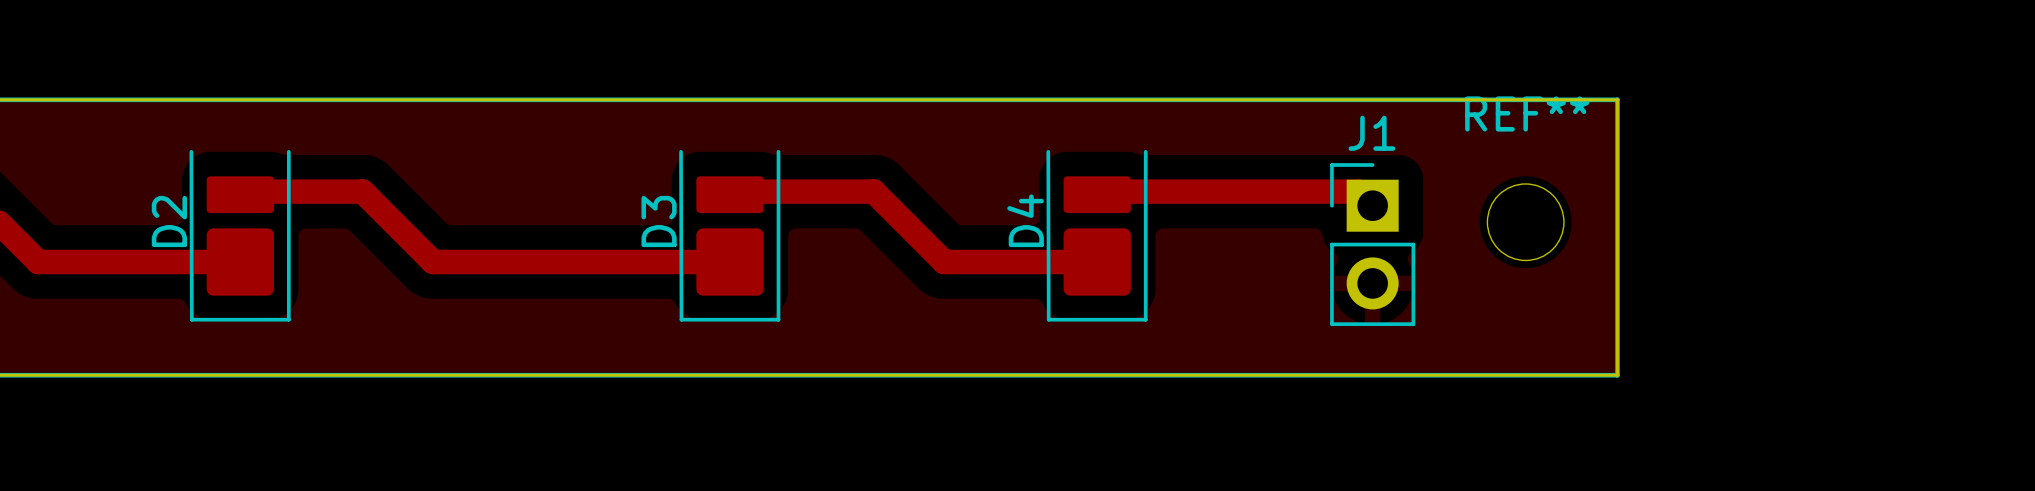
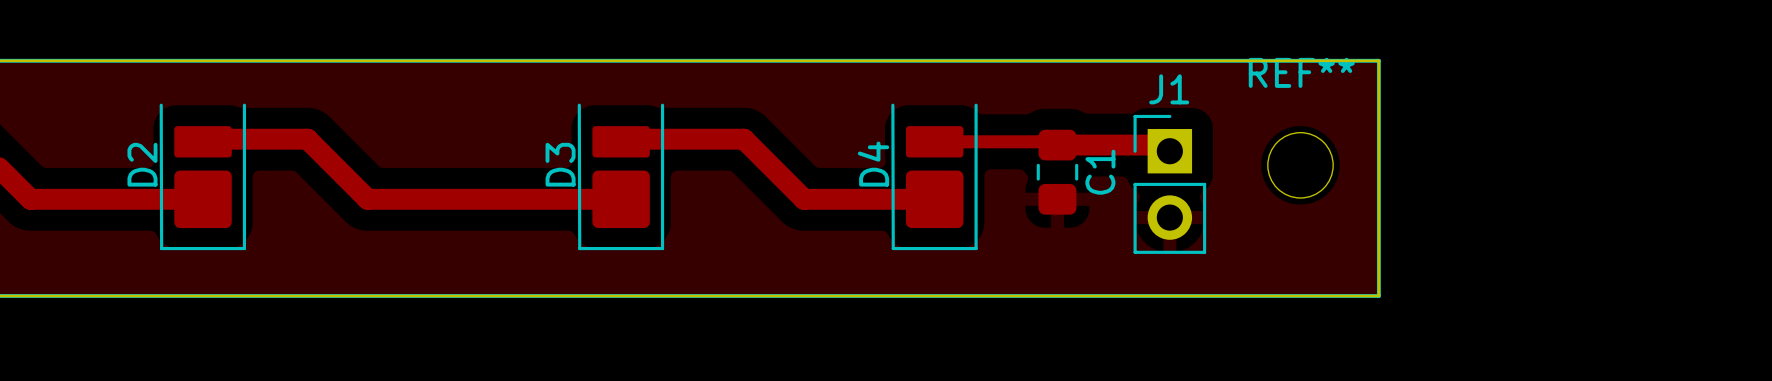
top track: (1097, 191) (1358, 191) -> none
top track: none -> (934, 141) (1054, 141) (1057, 145) (1163, 145)
C1: none -> (1057, 172)

